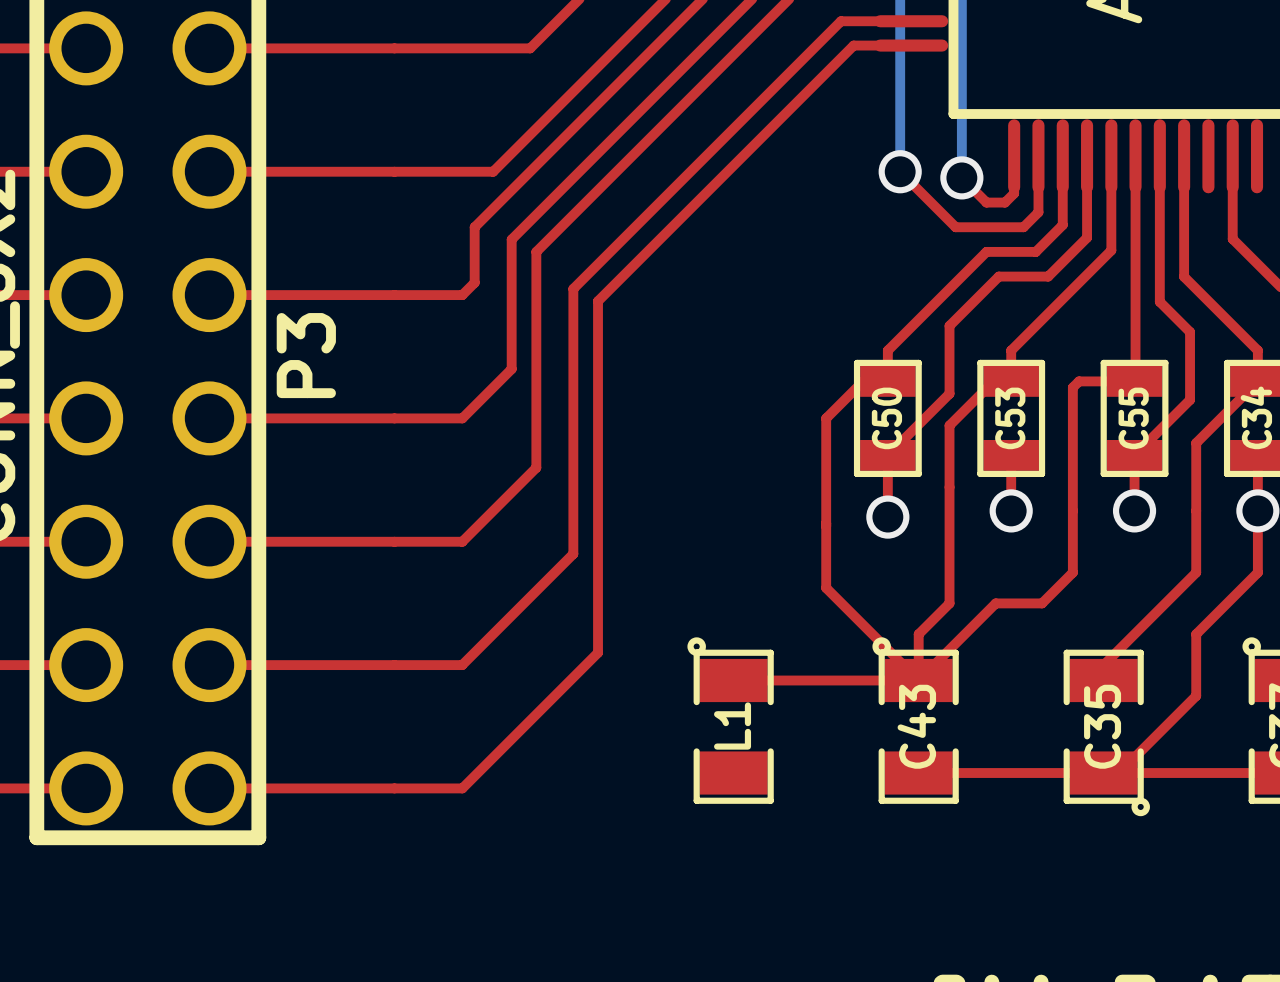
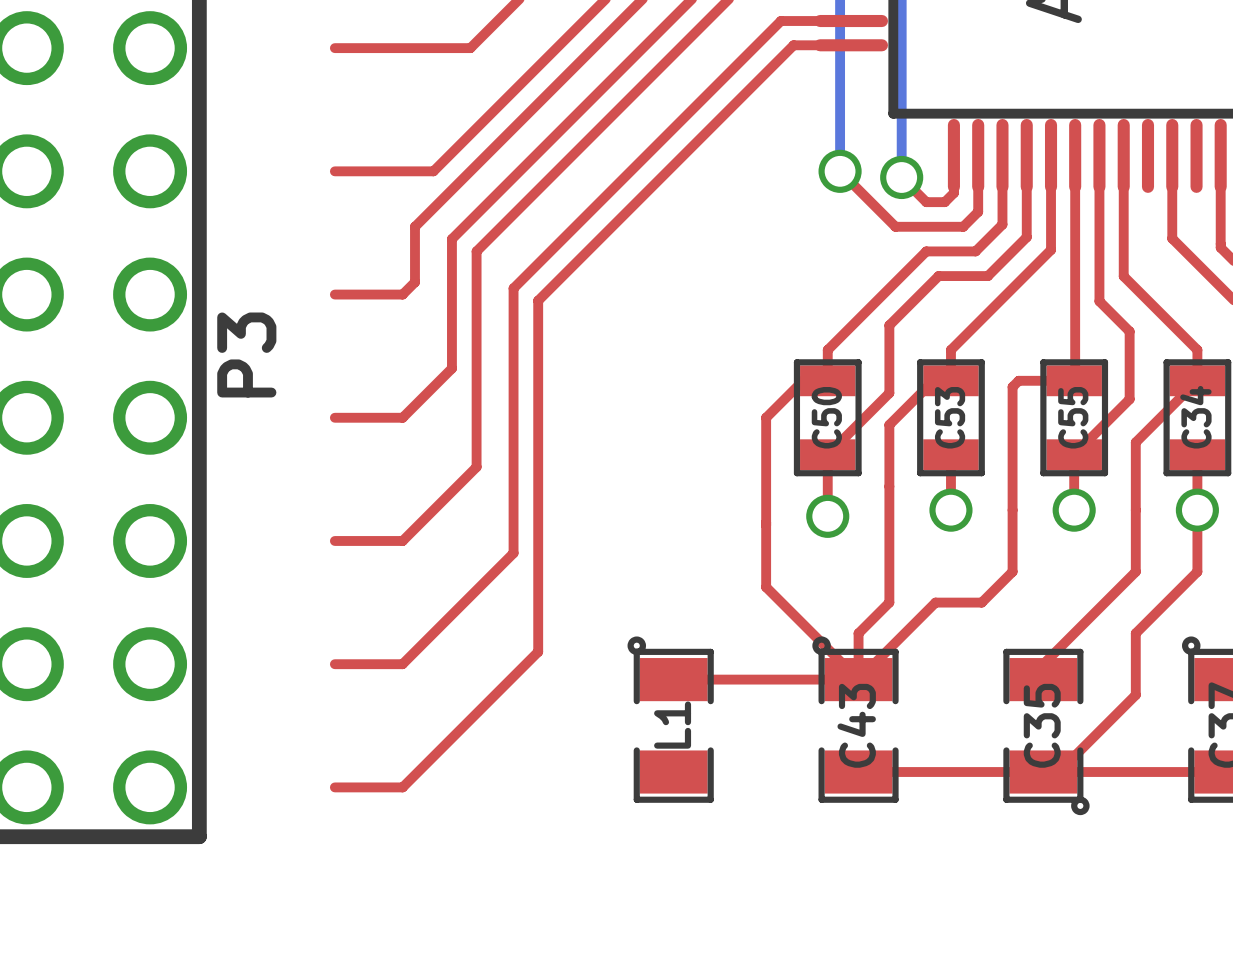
top track: (209, 48) (394, 48) -> none
top track: (209, 171) (394, 171) -> none
top track: (209, 295) (394, 295) -> none
top track: (209, 418) (394, 418) -> none
top track: (209, 541) (394, 541) -> none
top track: (209, 665) (394, 665) -> none
top track: (209, 788) (394, 788) -> none

